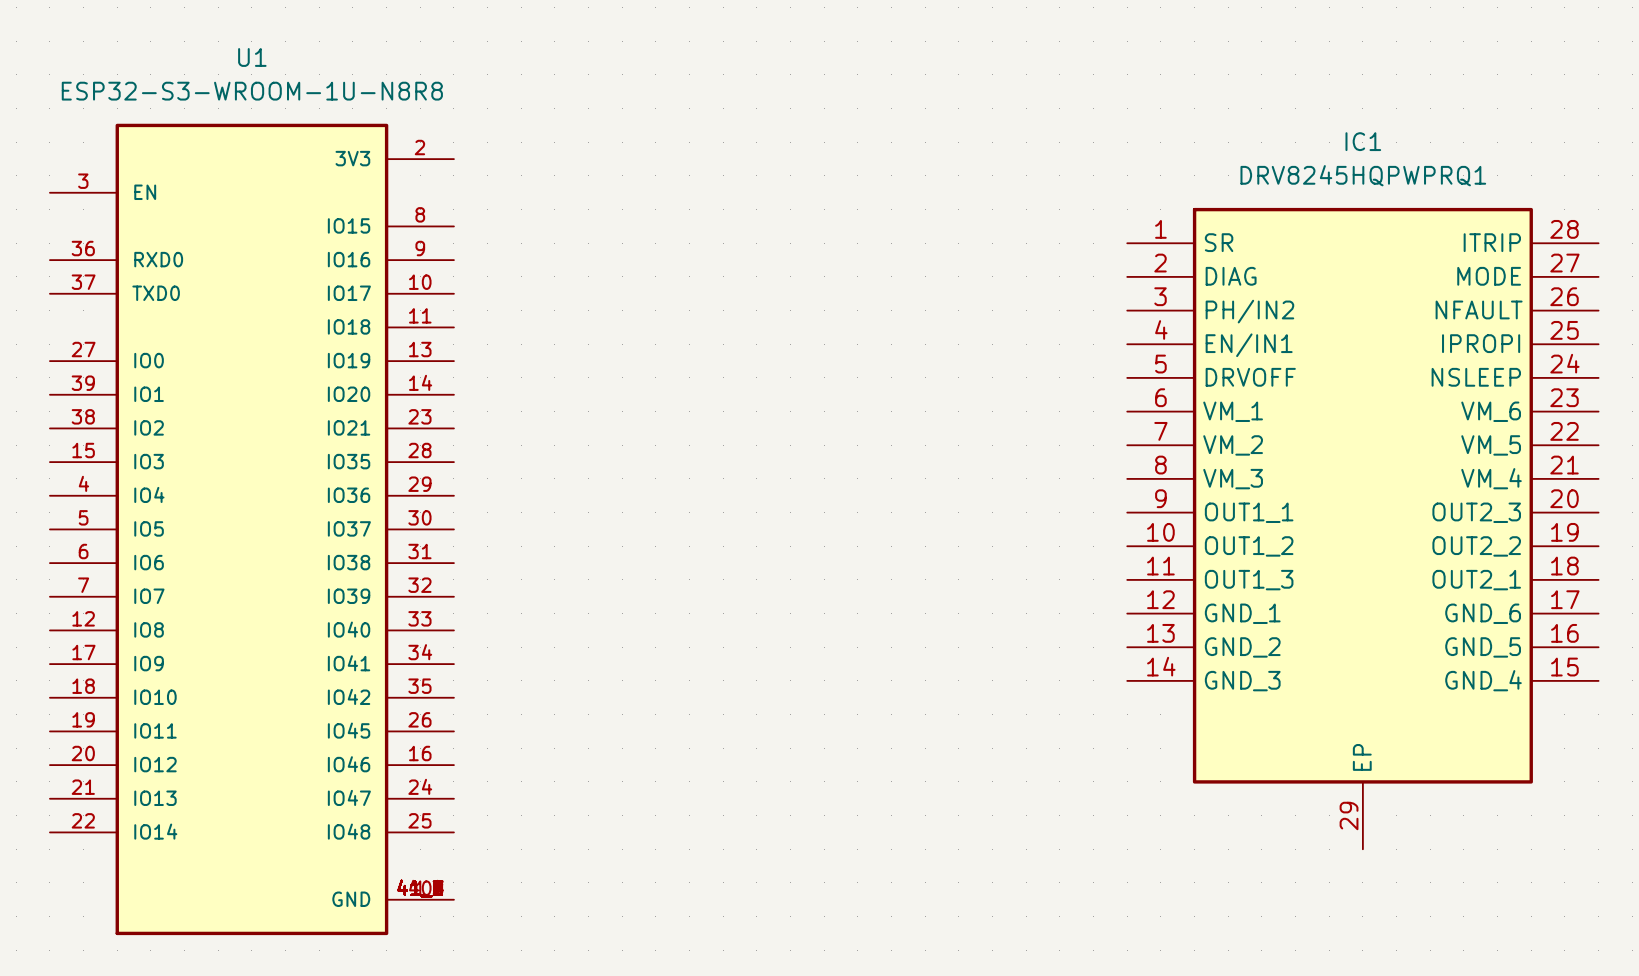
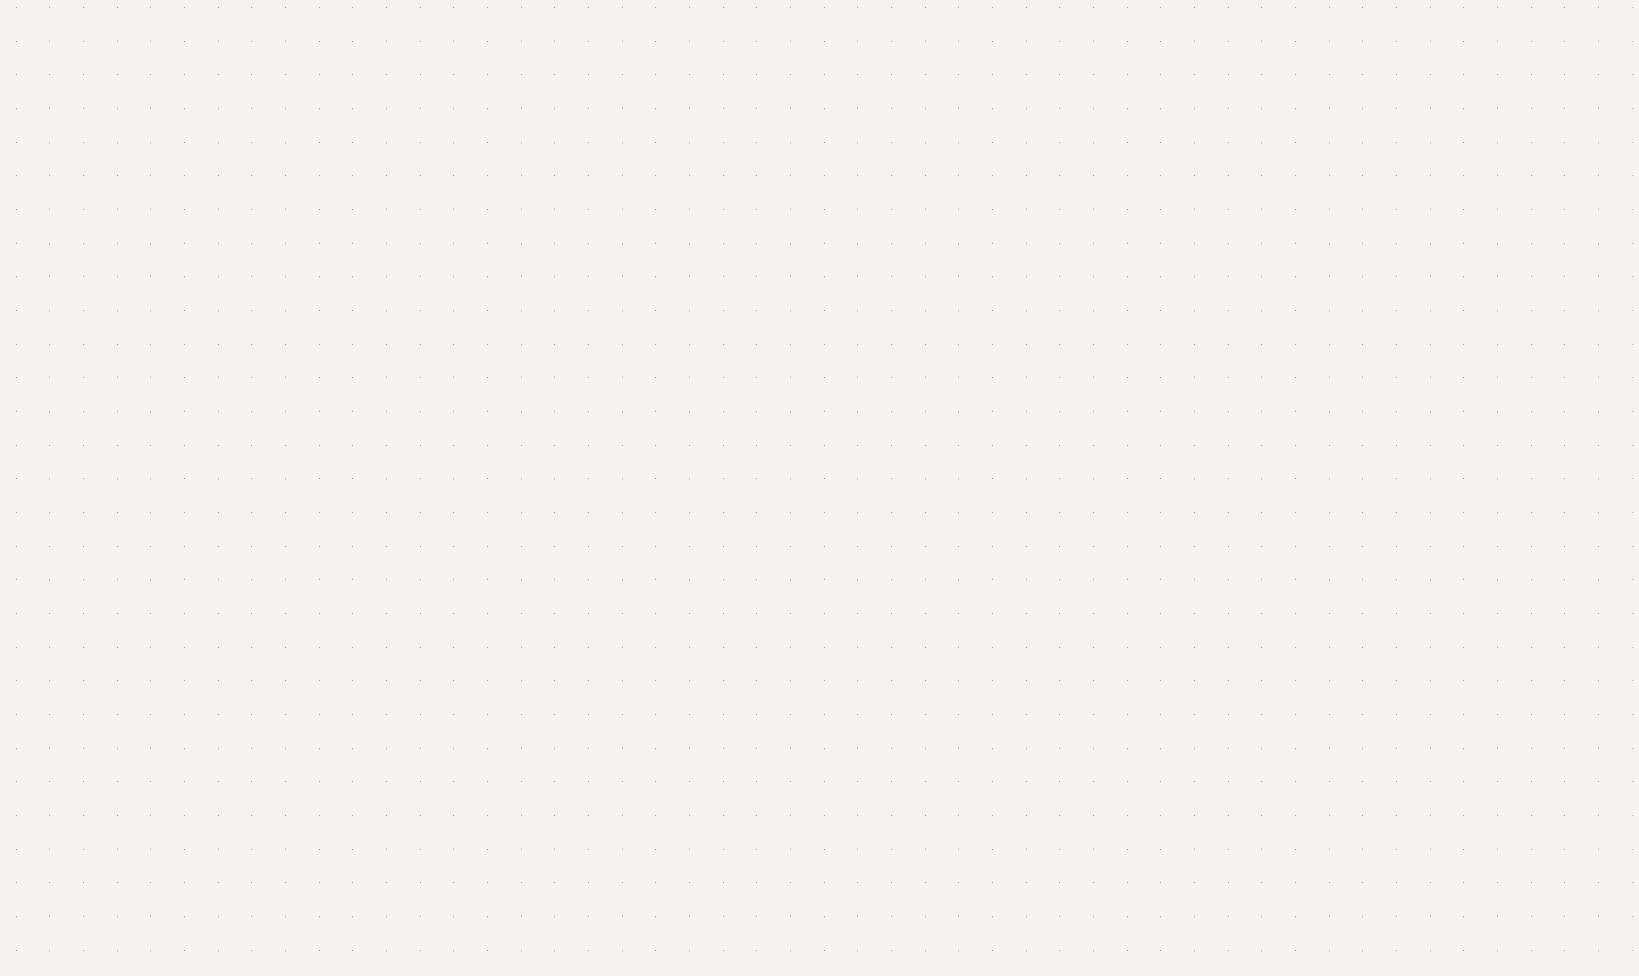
IC1: DRV8245HQPWPRQ1 (1362, 528) -> none
U1: ESP32-S3-WROOM-1U-N8R8 (251, 529) -> none

